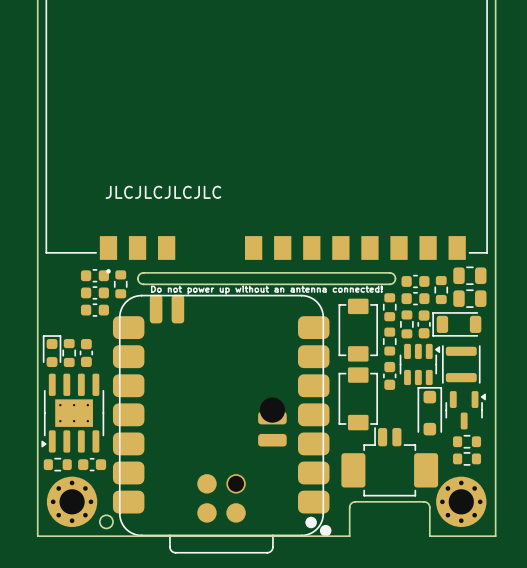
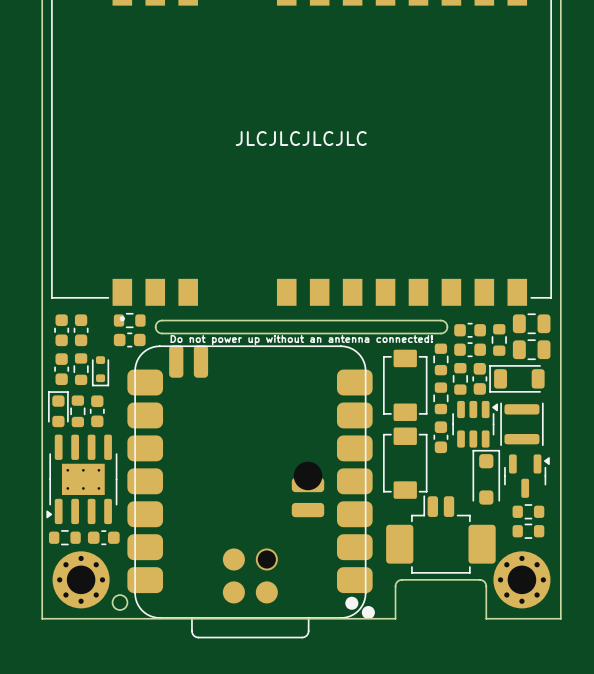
text position: JLCJLCJLCJLC (163, 192) -> JLCJLCJLCJLC (301, 138)
part: (94, 275) -> none
part: none -> (61, 330)
part: none -> (81, 330)
part rotation: 0° (120, 284) -> 90° clockwise (129, 320)
part: none -> (129, 339)
part: (94, 292) -> none
part footprint: [80, 303, 110, 317] -> [91, 356, 110, 387]
part: none -> (61, 369)
part: none -> (81, 369)

